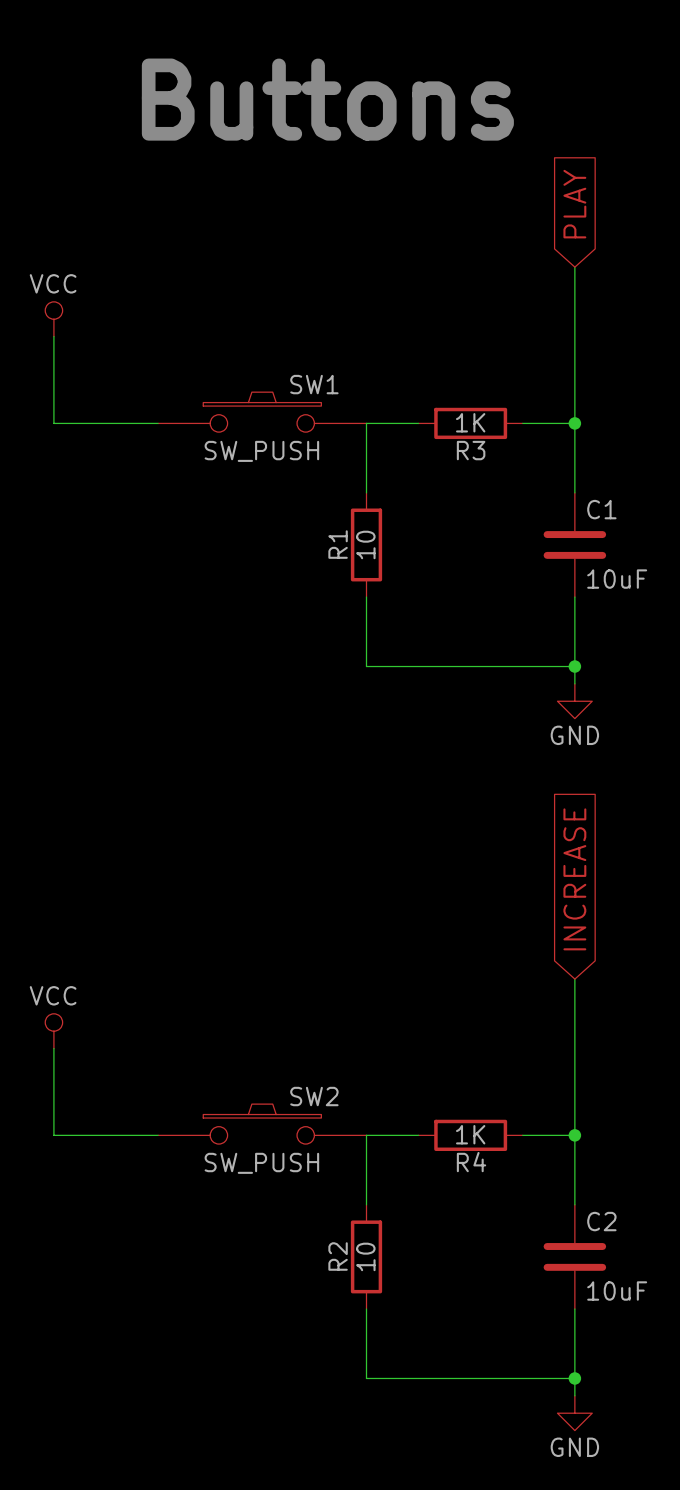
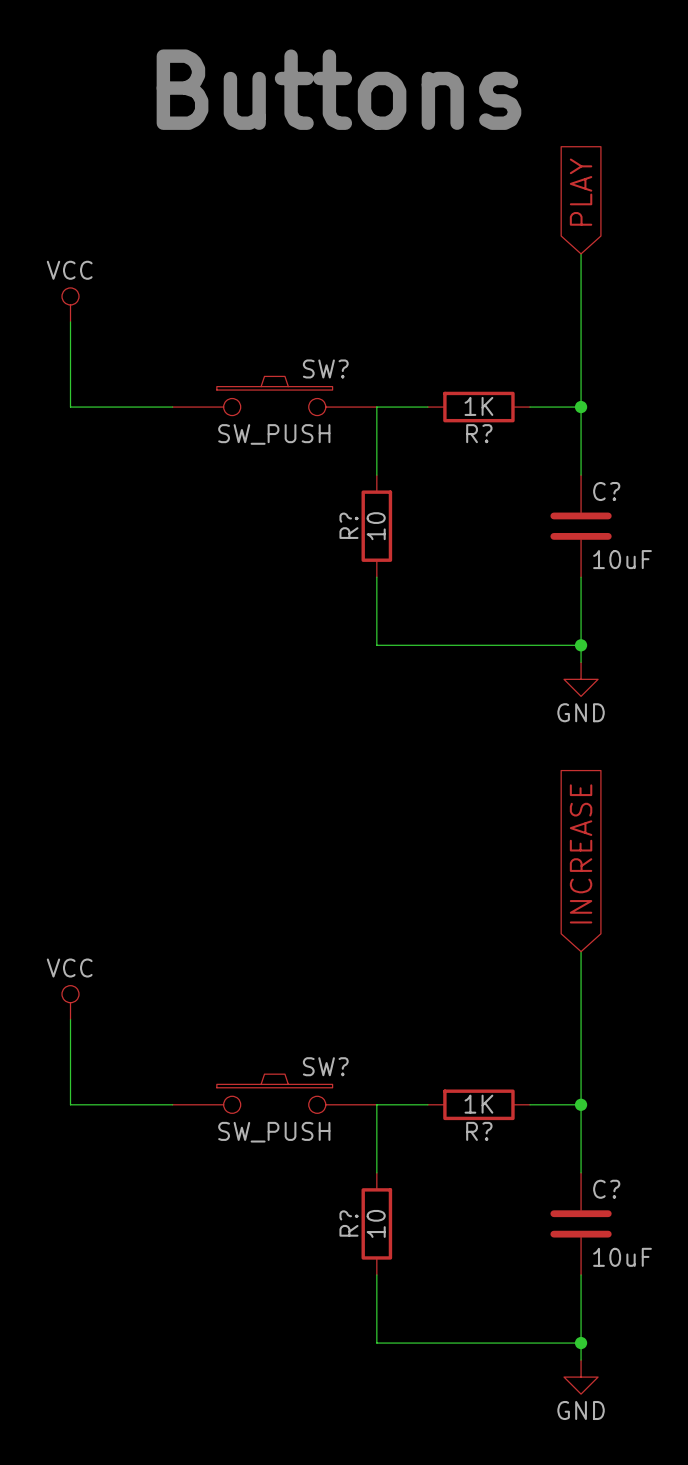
SW1 name: SW1 (314, 384) -> SW? (325, 368)
R3 name: R3 (471, 450) -> R? (479, 433)
C1 name: C1 (601, 509) -> C? (606, 491)
R1 name: R1 (338, 544) -> R? (348, 525)
SW2 name: SW2 (314, 1096) -> SW? (325, 1066)
R4 name: R4 (471, 1162) -> R? (479, 1131)
C2 name: C2 (601, 1221) -> C? (606, 1189)
R2 name: R2 (338, 1256) -> R? (348, 1223)

